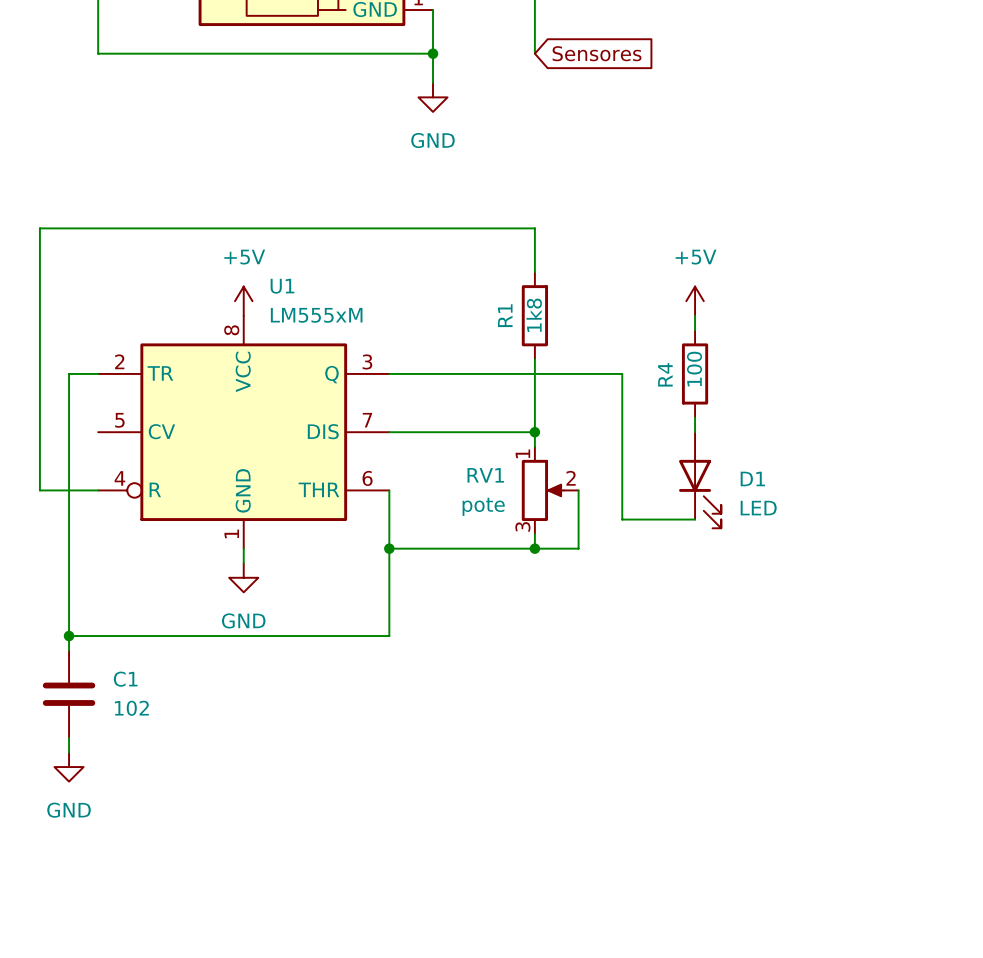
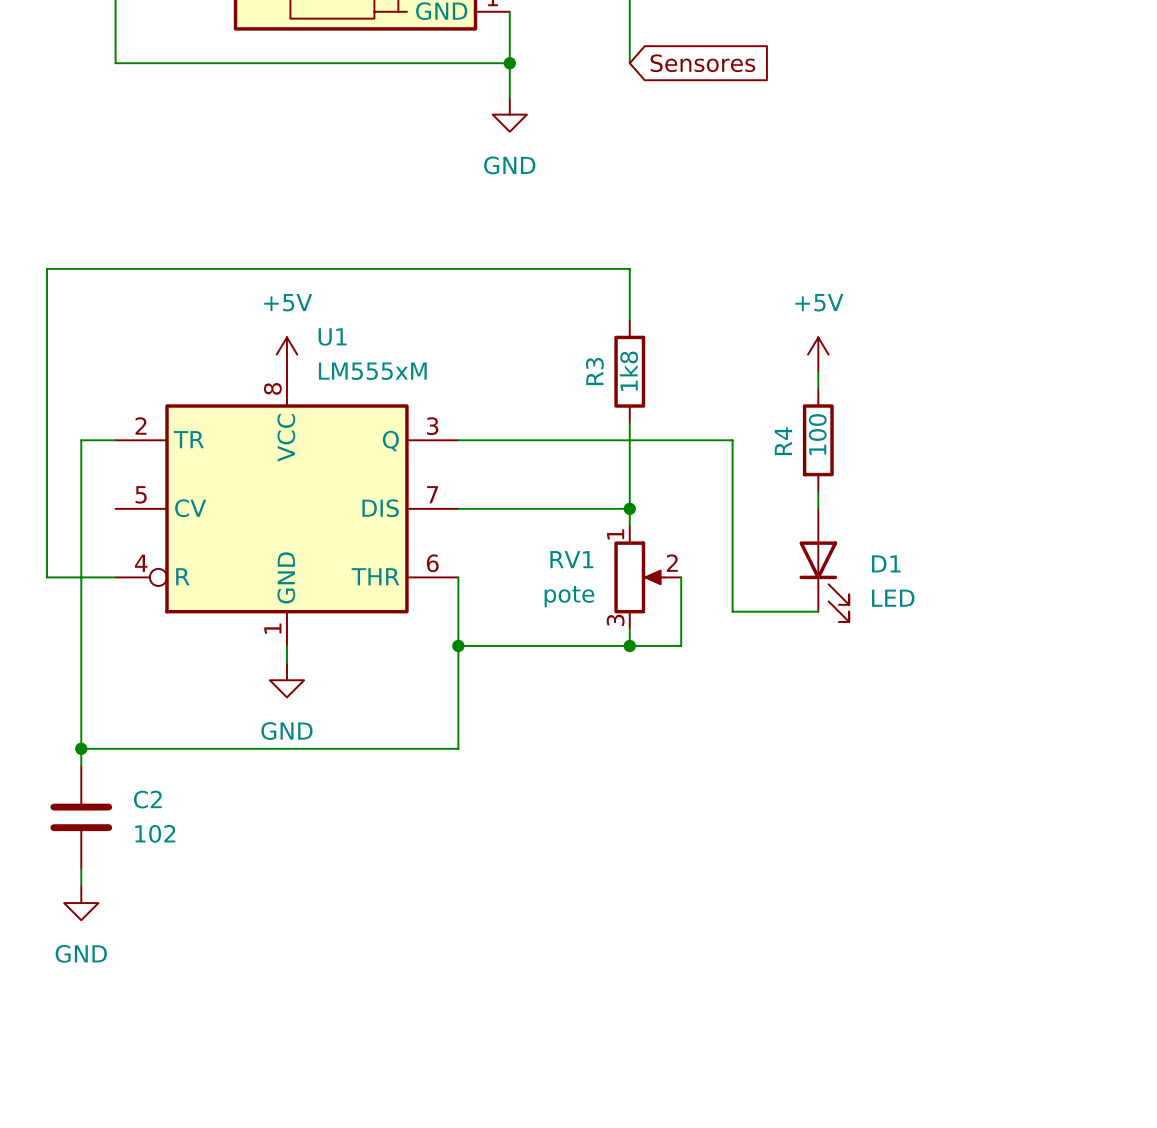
R1 name: R1 (505, 315) -> R3 (594, 371)
C1 name: C1 (125, 679) -> C2 (147, 799)

